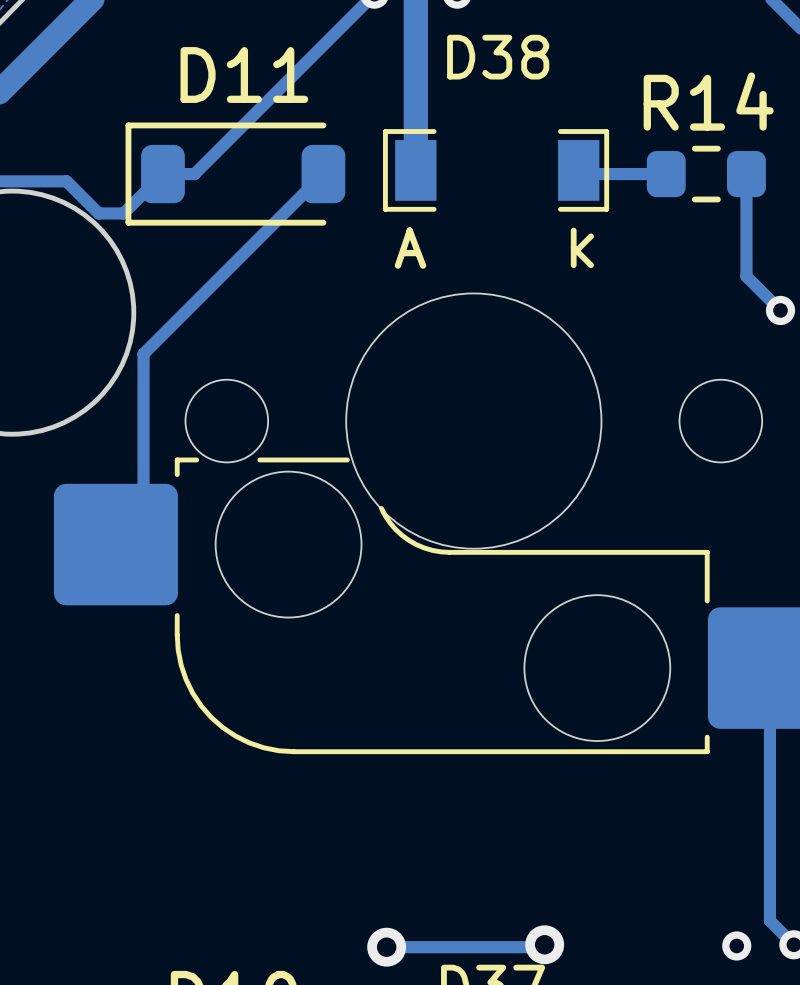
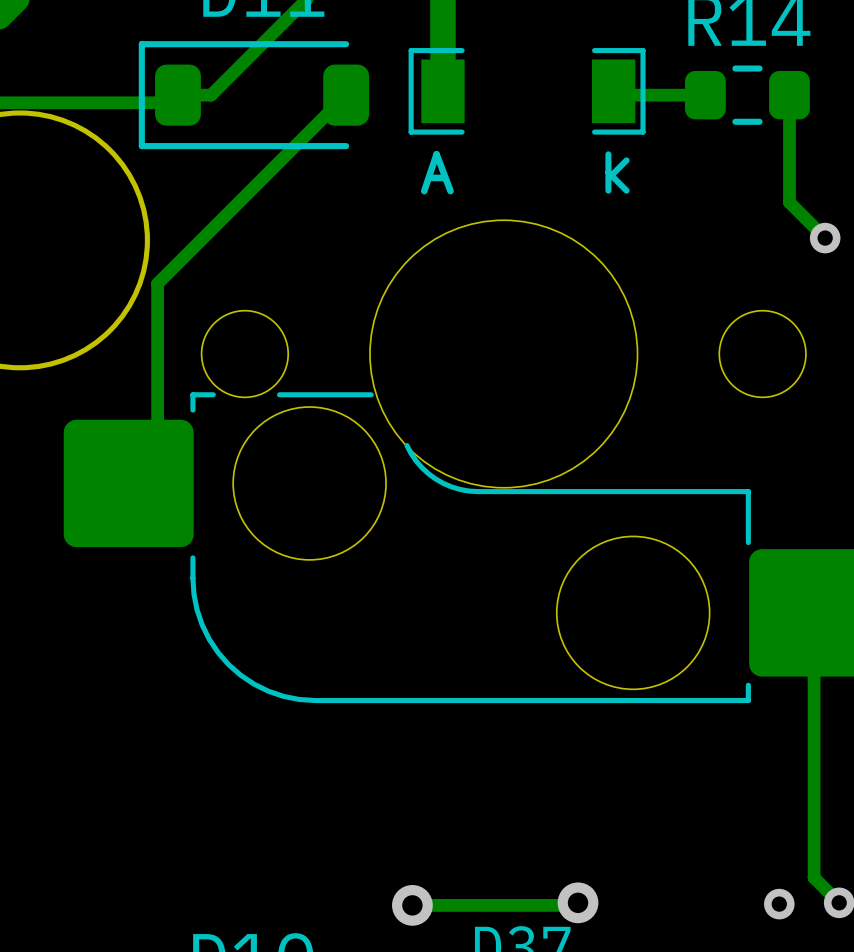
track: (155, 181) (123, 213) (98, 213) (66, 181) -> (170, 102) (77, 102)

